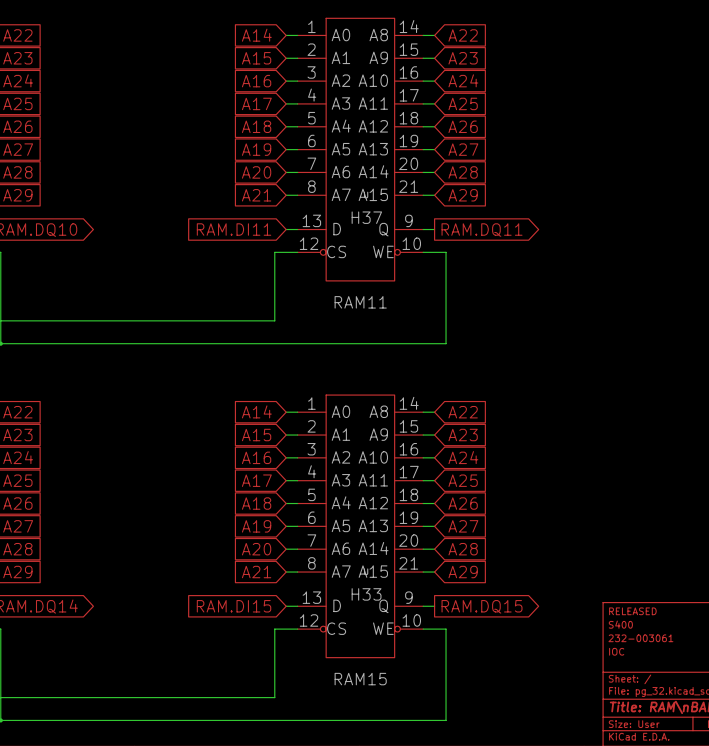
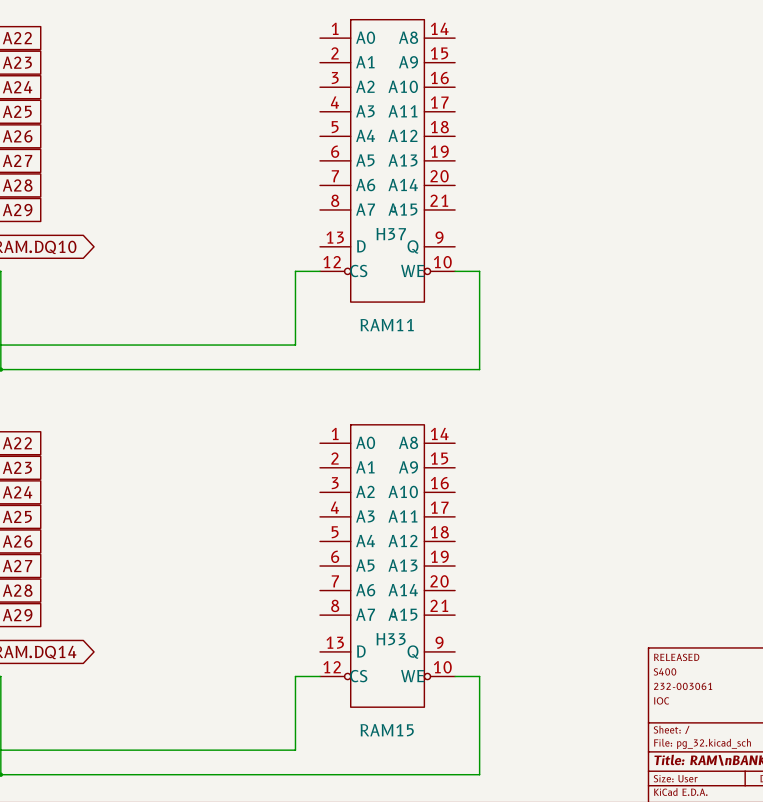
global label: A14 (256, 35) -> none
wire: (286, 35) (297, 35) -> none
wire: (423, 35) (434, 35) -> none
global label: A22 (463, 35) -> none
global label: A15 (256, 58) -> none
wire: (286, 58) (297, 58) -> none
wire: (423, 58) (434, 58) -> none
global label: A23 (463, 58) -> none
global label: A24 (463, 80) -> none
global label: A16 (256, 81) -> none
wire: (286, 81) (297, 81) -> none
wire: (423, 81) (434, 81) -> none
global label: A17 (256, 103) -> none
wire: (286, 103) (297, 103) -> none
wire: (423, 103) (434, 103) -> none
global label: A25 (463, 103) -> none
global label: A18 (256, 126) -> none
wire: (286, 126) (297, 126) -> none
wire: (423, 126) (434, 126) -> none
global label: A26 (463, 126) -> none
global label: A19 (256, 149) -> none
wire: (286, 149) (297, 149) -> none
wire: (423, 149) (434, 149) -> none
global label: A27 (463, 149) -> none
global label: A20 (256, 172) -> none
wire: (286, 172) (297, 172) -> none
wire: (423, 172) (434, 172) -> none
global label: A28 (463, 172) -> none
global label: A21 (256, 195) -> none
wire: (286, 195) (297, 195) -> none
wire: (423, 195) (434, 195) -> none
global label: A29 (463, 195) -> none
global label: RAM.DI11 (234, 229) -> none
wire: (286, 229) (297, 229) -> none
wire: (423, 229) (434, 229) -> none
global label: RAM.DQ11 (482, 230) -> none
global label: A14 (256, 411) -> none
wire: (286, 412) (297, 412) -> none
wire: (423, 412) (434, 412) -> none
global label: A22 (463, 412) -> none
global label: A15 (256, 435) -> none
wire: (286, 435) (297, 435) -> none
wire: (423, 435) (434, 435) -> none
global label: A23 (463, 435) -> none
global label: A16 (256, 457) -> none
wire: (286, 457) (297, 457) -> none
wire: (423, 457) (434, 457) -> none
global label: A24 (463, 457) -> none
global label: A17 (256, 480) -> none
wire: (286, 480) (297, 480) -> none
wire: (423, 480) (434, 480) -> none
global label: A25 (463, 480) -> none
global label: A18 (256, 503) -> none
wire: (286, 503) (297, 503) -> none
wire: (423, 503) (434, 503) -> none
global label: A26 (463, 503) -> none
global label: A19 (256, 526) -> none
wire: (286, 526) (297, 526) -> none
wire: (423, 526) (434, 526) -> none
global label: A27 (463, 526) -> none
global label: A20 (256, 549) -> none
wire: (286, 549) (297, 549) -> none
wire: (423, 549) (434, 549) -> none
global label: A28 (463, 549) -> none
global label: A21 (256, 572) -> none
wire: (286, 572) (297, 572) -> none
wire: (423, 572) (434, 572) -> none
global label: A29 (463, 572) -> none
global label: RAM.DI15 (234, 606) -> none
wire: (286, 606) (297, 606) -> none
wire: (423, 606) (434, 606) -> none
global label: RAM.DQ15 (482, 606) -> none

